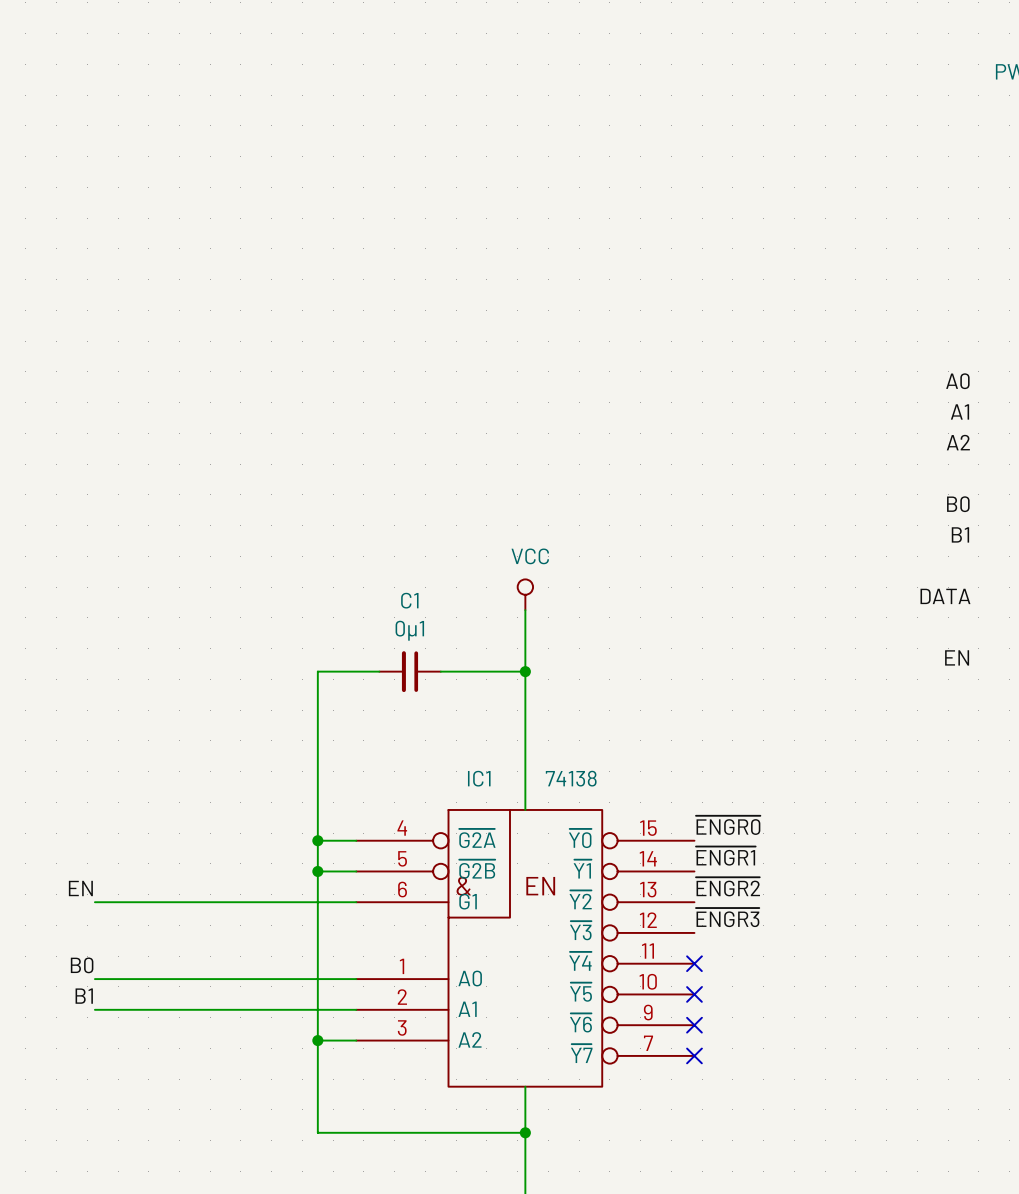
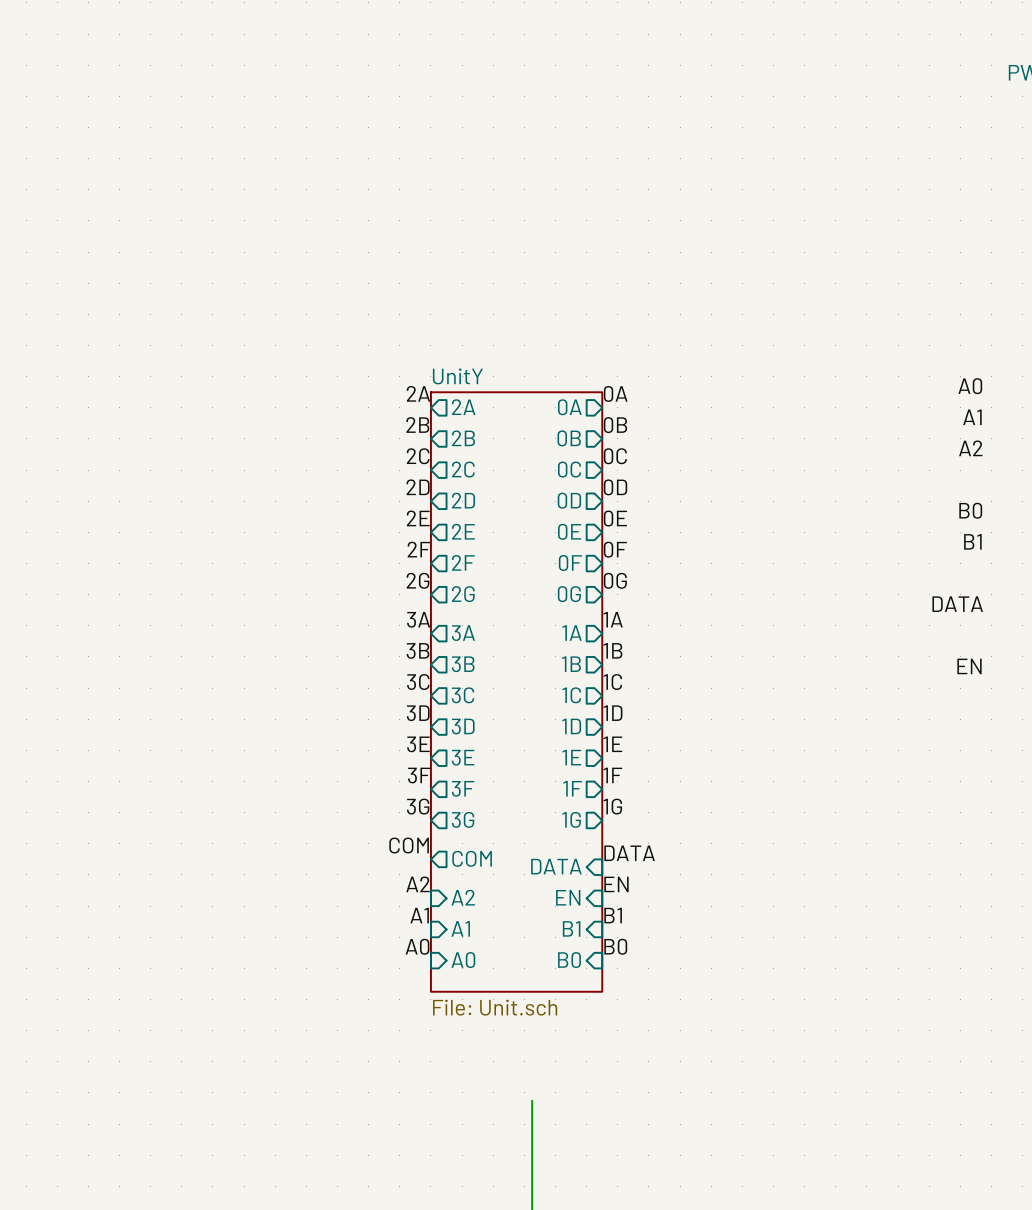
label: none -> 2A (418, 393)
label: none -> 0A (615, 393)
sheet pin: none -> 2A (463, 407)
sheet pin: none -> 0A (569, 407)
label: none -> 2B (417, 424)
label: none -> 0B (615, 425)
sheet pin: none -> 2B (463, 438)
sheet pin: none -> 0B (569, 438)
label: none -> 2C (418, 456)
label: none -> 0C (615, 456)
sheet pin: none -> 2C (463, 469)
sheet pin: none -> 0C (569, 469)
label: none -> 2D (418, 487)
label: none -> 0D (615, 487)
sheet pin: none -> 2D (463, 500)
sheet pin: none -> 0D (569, 500)
label: none -> 2E (418, 518)
label: none -> 0E (615, 518)
sheet pin: none -> 2E (463, 531)
sheet pin: none -> 0E (569, 531)
label: none -> 2F (419, 549)
label: none -> 0F (615, 549)
sheet pin: none -> 2F (463, 562)
sheet pin: none -> 0F (570, 562)
label: none -> 2G (418, 580)
label: none -> 0G (615, 580)
sheet pin: none -> 2G (463, 594)
sheet pin: none -> 0G (569, 594)
power symbol: VCC (525, 594) -> none
wire: (525, 610) (525, 809) -> none
label: none -> 3A (418, 619)
label: none -> 1A (613, 619)
sheet pin: none -> 1A (572, 633)
sheet pin: none -> 3A (463, 633)
label: none -> 3B (418, 650)
label: none -> 1B (612, 650)
sheet pin: none -> 3B (463, 664)
sheet pin: none -> 1B (571, 664)
wire: (379, 671) (317, 671) (317, 1132) (525, 1132) -> none
C1: 0μ1 (410, 671) -> none
wire: (440, 671) (525, 671) -> none
junction: (525, 671) -> none
label: none -> 3C (418, 682)
label: none -> 1C (612, 682)
sheet UnitY: none -> File: Unit.sch (516, 692)
sheet pin: none -> 3C (463, 695)
sheet pin: none -> 1C (571, 695)
label: none -> 3D (418, 713)
label: none -> 1D (612, 713)
sheet pin: none -> 3D (463, 726)
sheet pin: none -> 1D (571, 726)
label: none -> 3E (418, 744)
label: none -> 1E (612, 744)
sheet pin: none -> 1E (571, 757)
sheet pin: none -> 3E (463, 757)
label: none -> 3F (419, 775)
label: none -> 1F (612, 775)
sheet pin: none -> 3F (463, 788)
sheet pin: none -> 1F (572, 788)
label: none -> 3G (418, 806)
label: none -> 1G (612, 806)
sheet pin: none -> 3G (463, 819)
sheet pin: none -> 1G (571, 819)
label: ~{ENGR0} (728, 825) -> none
label: none -> COM (409, 845)
wire: (317, 840) (356, 840) -> none
junction: (317, 840) -> none
label: none -> DATA (629, 853)
sheet pin: none -> COM (472, 858)
sheet pin: none -> DATA (556, 866)
label: ~{ENGR1} (725, 856) -> none
wire: (317, 871) (356, 871) -> none
junction: (317, 871) -> none
label: none -> A2 (417, 884)
label: none -> EN (616, 884)
sheet pin: none -> A2 (463, 897)
sheet pin: none -> EN (568, 897)
label: ~{ENGR2} (727, 886) -> none
label: EN (80, 888) -> none
wire: (94, 902) (356, 902) -> none
label: none -> A1 (419, 915)
label: none -> B1 (613, 915)
sheet pin: none -> A1 (460, 928)
sheet pin: none -> B1 (571, 928)
label: ~{ENGR3} (727, 917) -> none
label: none -> A0 (417, 946)
label: none -> B0 (615, 946)
sheet pin: none -> A0 (463, 960)
sheet pin: none -> B0 (569, 960)
IC1: 74138 (525, 948) -> none
no-connect mark: (694, 963) -> none
label: B0 (82, 965) -> none
wire: (94, 979) (356, 979) -> none
no-connect mark: (694, 994) -> none
label: B1 (84, 996) -> none
wire: (94, 1009) (356, 1009) -> none
no-connect mark: (694, 1025) -> none
wire: (317, 1040) (356, 1040) -> none
junction: (317, 1040) -> none
no-connect mark: (694, 1055) -> none
junction: (525, 1132) -> none

